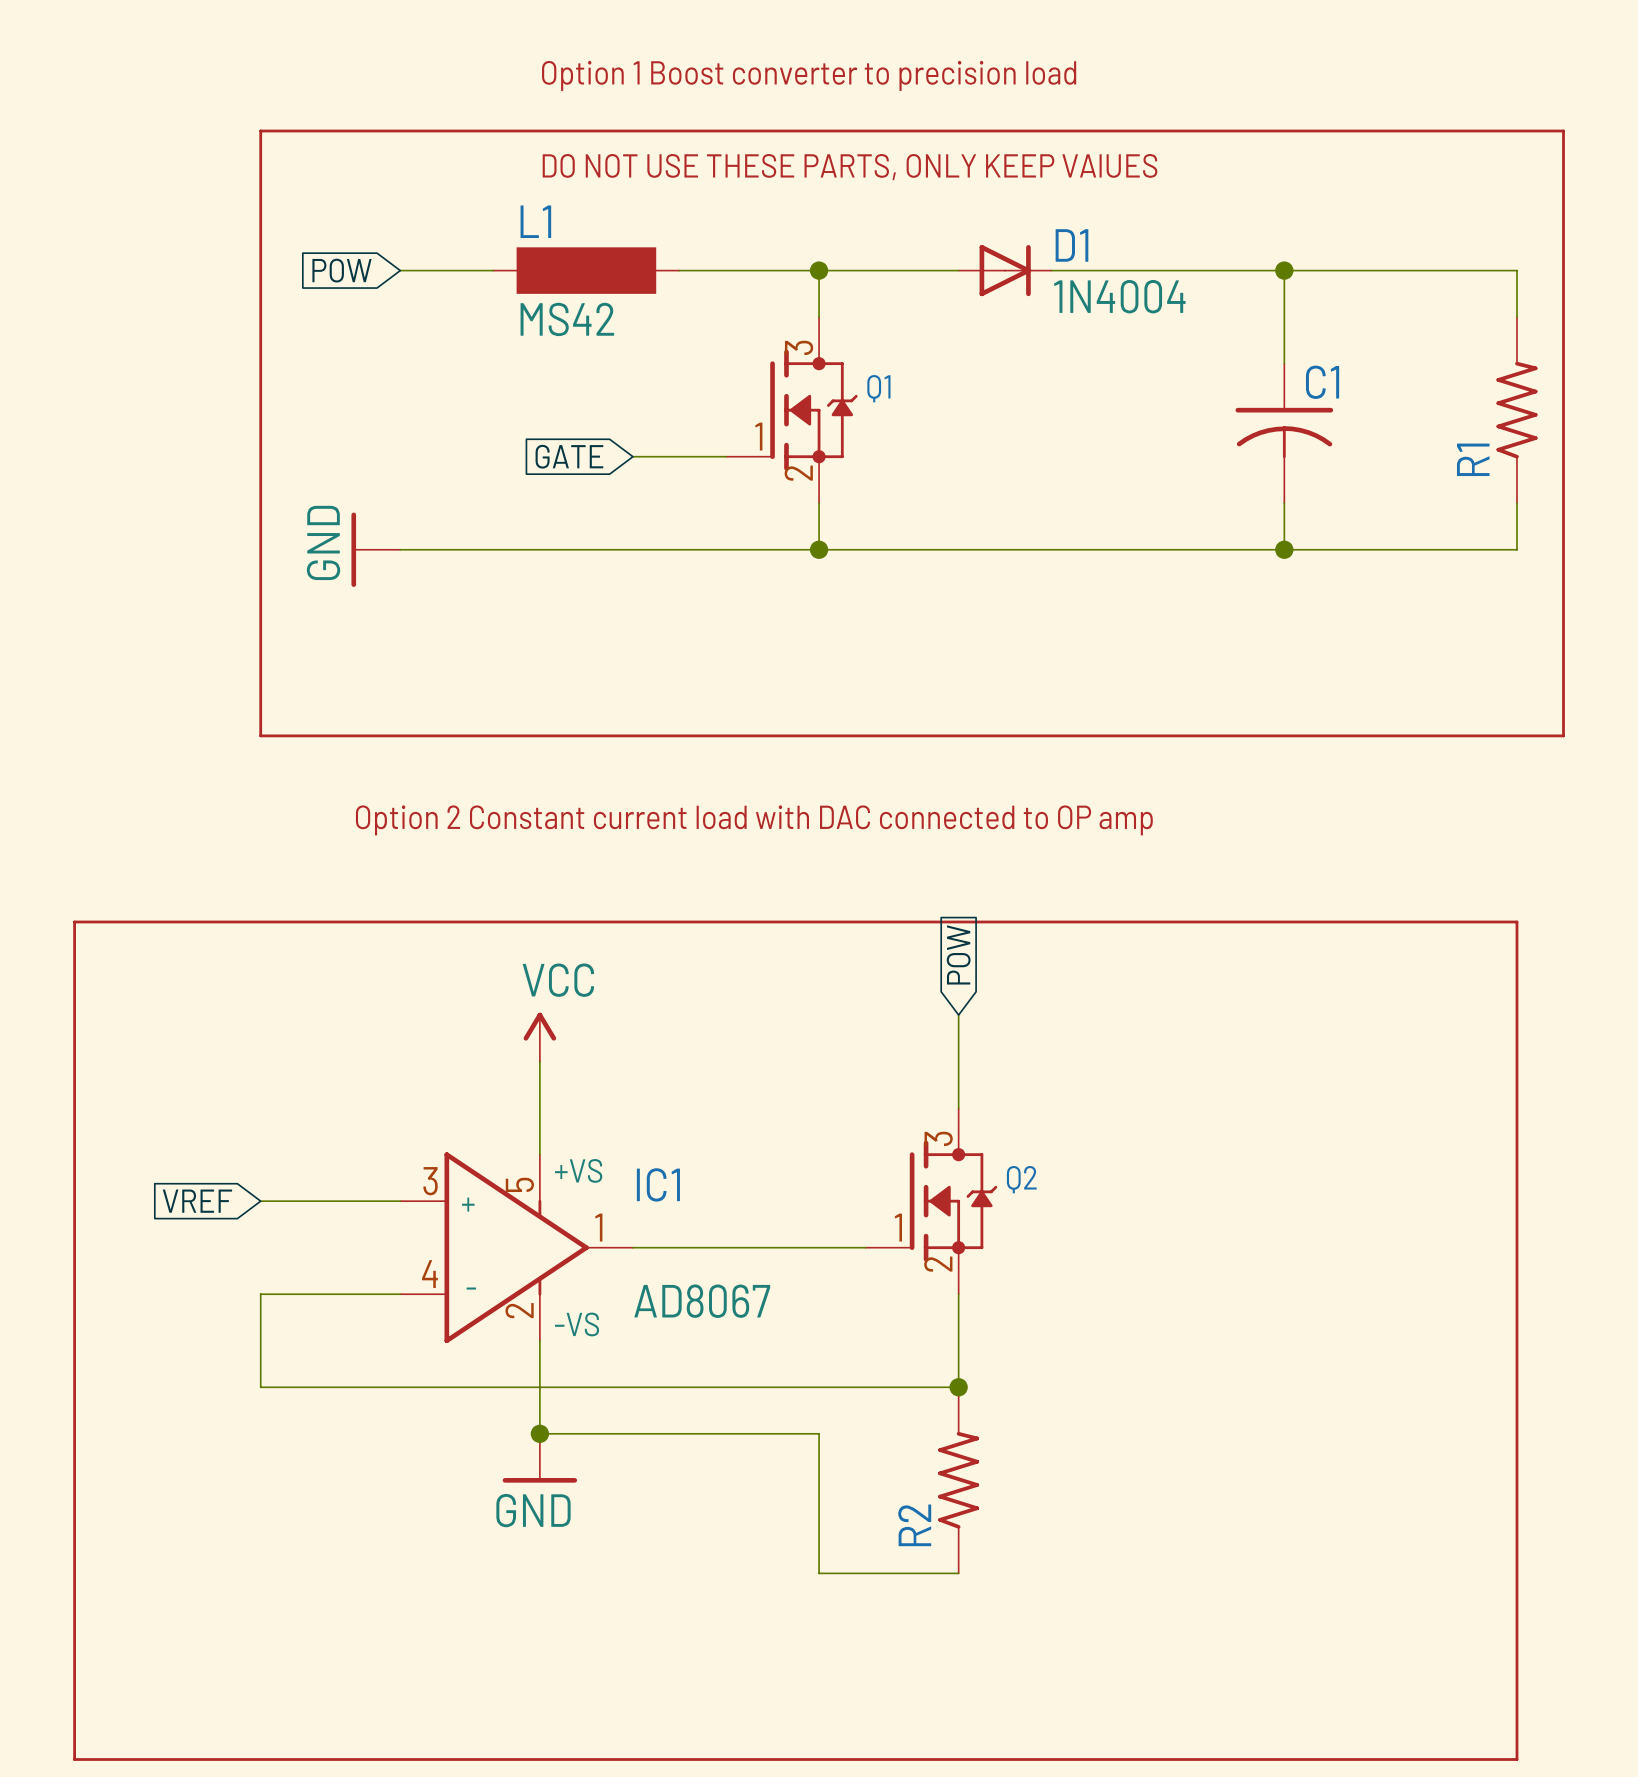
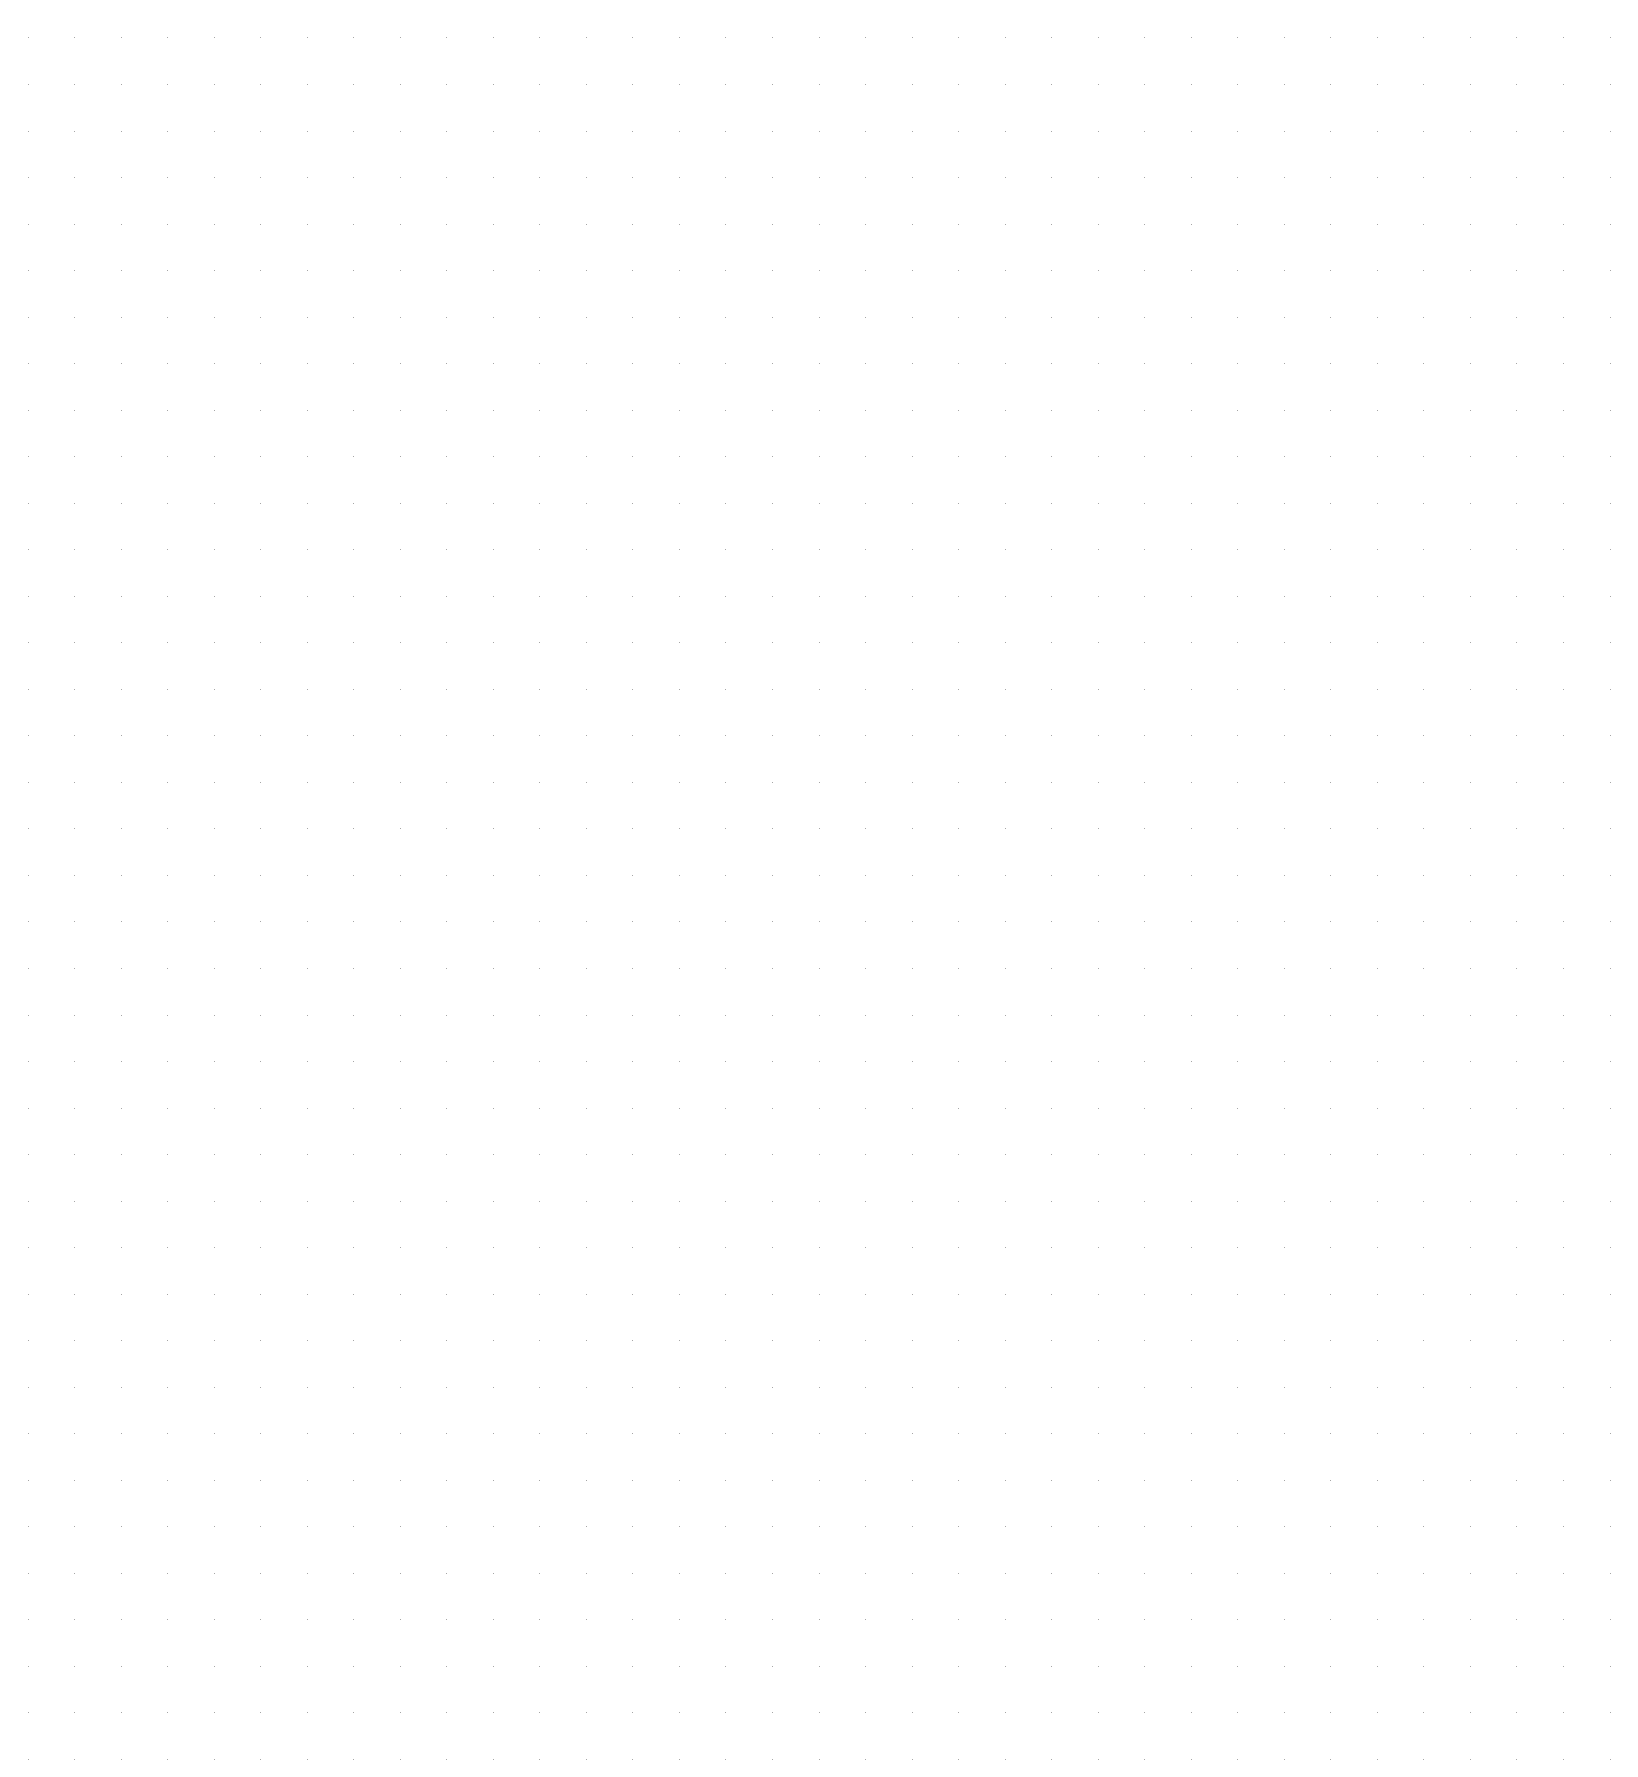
text: Option 1 Boost converter to precision load (809, 75) -> none
line: (260, 131) (1563, 131) (1563, 735) (260, 735) (260, 131) -> none
text: DO NOT USE THESE PARTS, ONLY KEEP VAlUES (850, 167) -> none
global label: POW (341, 270) -> none
wire: (400, 270) (493, 270) -> none
L1: MS42 (586, 270) -> none
wire: (679, 270) (958, 270) -> none
wire: (819, 270) (819, 317) -> none
junction: (819, 270) -> none
D1: 1N4004 (1005, 270) -> none
wire: (1051, 270) (1516, 270) (1516, 317) -> none
wire: (1284, 270) (1284, 363) -> none
junction: (1284, 270) -> none
Q1: (791, 410) -> none
R1: (1516, 410) -> none
C1: (1284, 433) -> none
global label: GATE (569, 456) -> none
wire: (632, 456) (725, 456) -> none
wire: (819, 503) (819, 549) -> none
wire: (1284, 503) (1284, 549) -> none
wire: (1516, 503) (1516, 549) (400, 549) -> none
power symbol: GND (375, 549) -> none
junction: (819, 549) -> none
junction: (1284, 549) -> none
text: Option 2 Constant current load with DAC connected to OP amp (754, 820) -> none
line: (74, 921) (1516, 921) (1516, 1759) (74, 1759) (74, 921) -> none
global label: POW (958, 954) -> none
wire: (958, 1015) (958, 1108) -> none
power symbol: VCC (539, 1037) -> none
wire: (539, 1061) (539, 1154) -> none
global label: VREF (197, 1201) -> none
wire: (260, 1201) (400, 1201) -> none
Q2: (931, 1201) -> none
IC1: AD8067 (516, 1247) -> none
wire: (632, 1247) (865, 1247) -> none
wire: (400, 1294) (260, 1294) (260, 1387) (958, 1387) (958, 1294) -> none
wire: (539, 1340) (539, 1433) (819, 1433) (819, 1573) (958, 1573) -> none
junction: (958, 1387) -> none
junction: (539, 1433) -> none
power symbol: GND (539, 1458) -> none
R2: (958, 1480) -> none

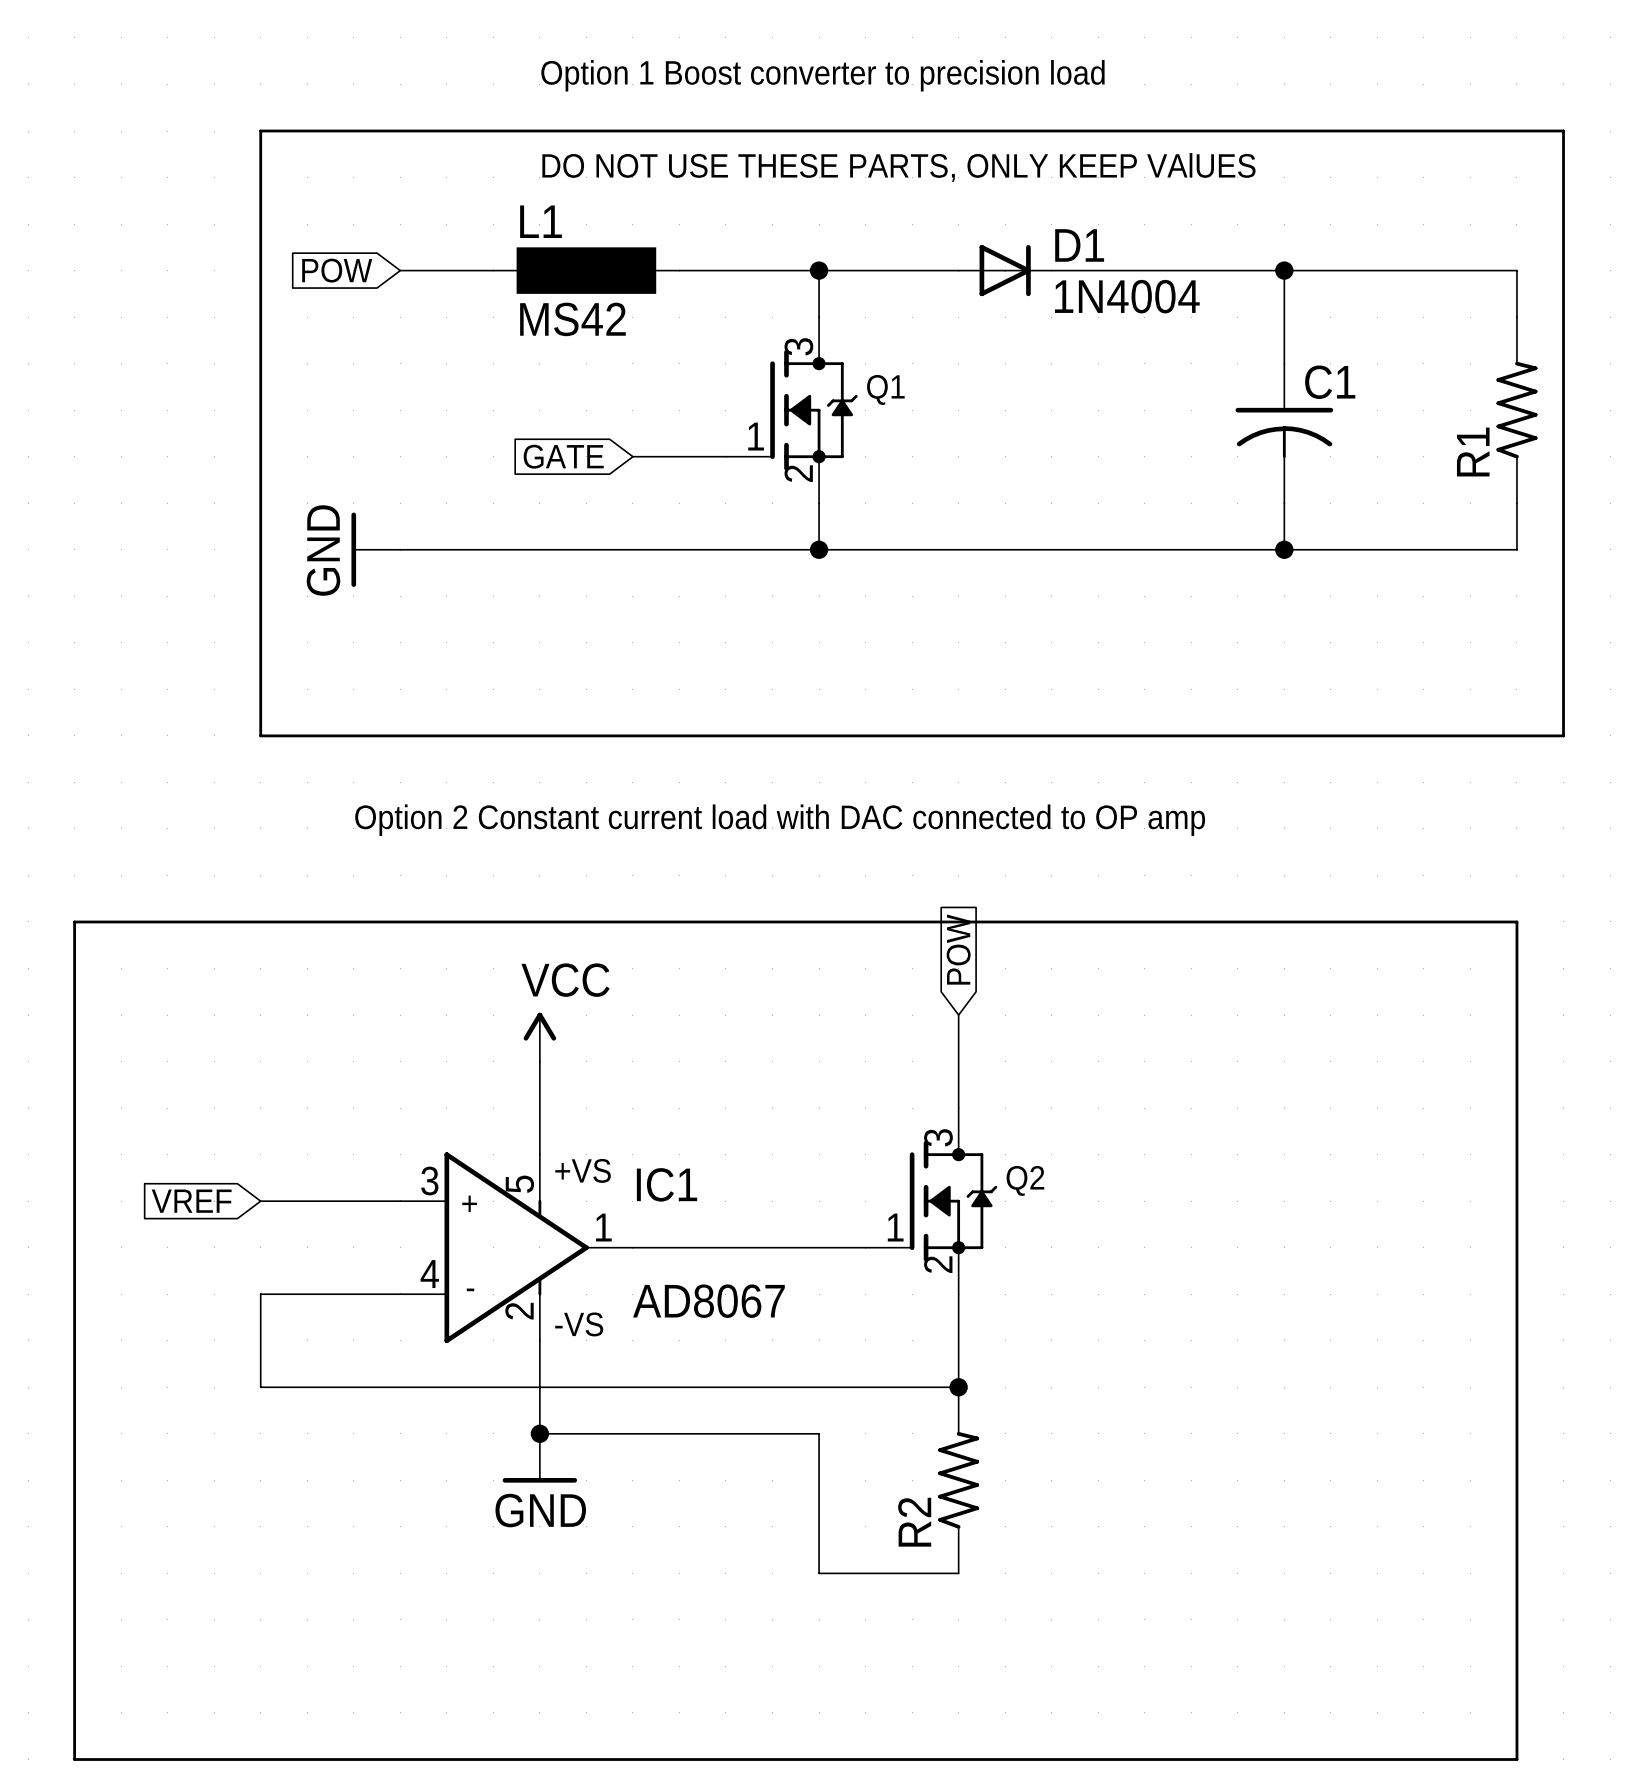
text: none -> Option 1 Boost converter to precision load (822, 75)
line: none -> (260, 131) (1563, 131) (1563, 735) (260, 735) (260, 131)
text: none -> DO NOT USE THESE PARTS, ONLY KEEP VAlUES (898, 167)
global label: none -> POW (337, 270)
wire: none -> (400, 270) (493, 270)
L1: none -> MS42 (586, 270)
wire: none -> (679, 270) (958, 270)
wire: none -> (819, 270) (819, 317)
junction: none -> (819, 270)
D1: none -> 1N4004 (1005, 270)
wire: none -> (1051, 270) (1516, 270) (1516, 317)
wire: none -> (1284, 270) (1284, 363)
junction: none -> (1284, 270)
Q1: none -> (791, 410)
R1: none -> (1516, 410)
C1: none -> (1284, 433)
global label: none -> GATE (563, 456)
wire: none -> (632, 456) (725, 456)
wire: none -> (819, 503) (819, 549)
wire: none -> (1284, 503) (1284, 549)
wire: none -> (1516, 503) (1516, 549) (400, 549)
power symbol: none -> GND (375, 549)
junction: none -> (819, 549)
junction: none -> (1284, 549)
text: none -> Option 2 Constant current load with DAC connected to OP amp (780, 820)
line: none -> (74, 921) (1516, 921) (1516, 1759) (74, 1759) (74, 921)
global label: none -> POW (958, 949)
wire: none -> (958, 1015) (958, 1108)
power symbol: none -> VCC (539, 1037)
wire: none -> (539, 1061) (539, 1154)
global label: none -> VREF (191, 1201)
wire: none -> (260, 1201) (400, 1201)
Q2: none -> (931, 1201)
IC1: none -> AD8067 (516, 1247)
wire: none -> (632, 1247) (865, 1247)
wire: none -> (400, 1294) (260, 1294) (260, 1387) (958, 1387) (958, 1294)
wire: none -> (539, 1340) (539, 1433) (819, 1433) (819, 1573) (958, 1573)
junction: none -> (958, 1387)
junction: none -> (539, 1433)
power symbol: none -> GND (539, 1458)
R2: none -> (958, 1480)

